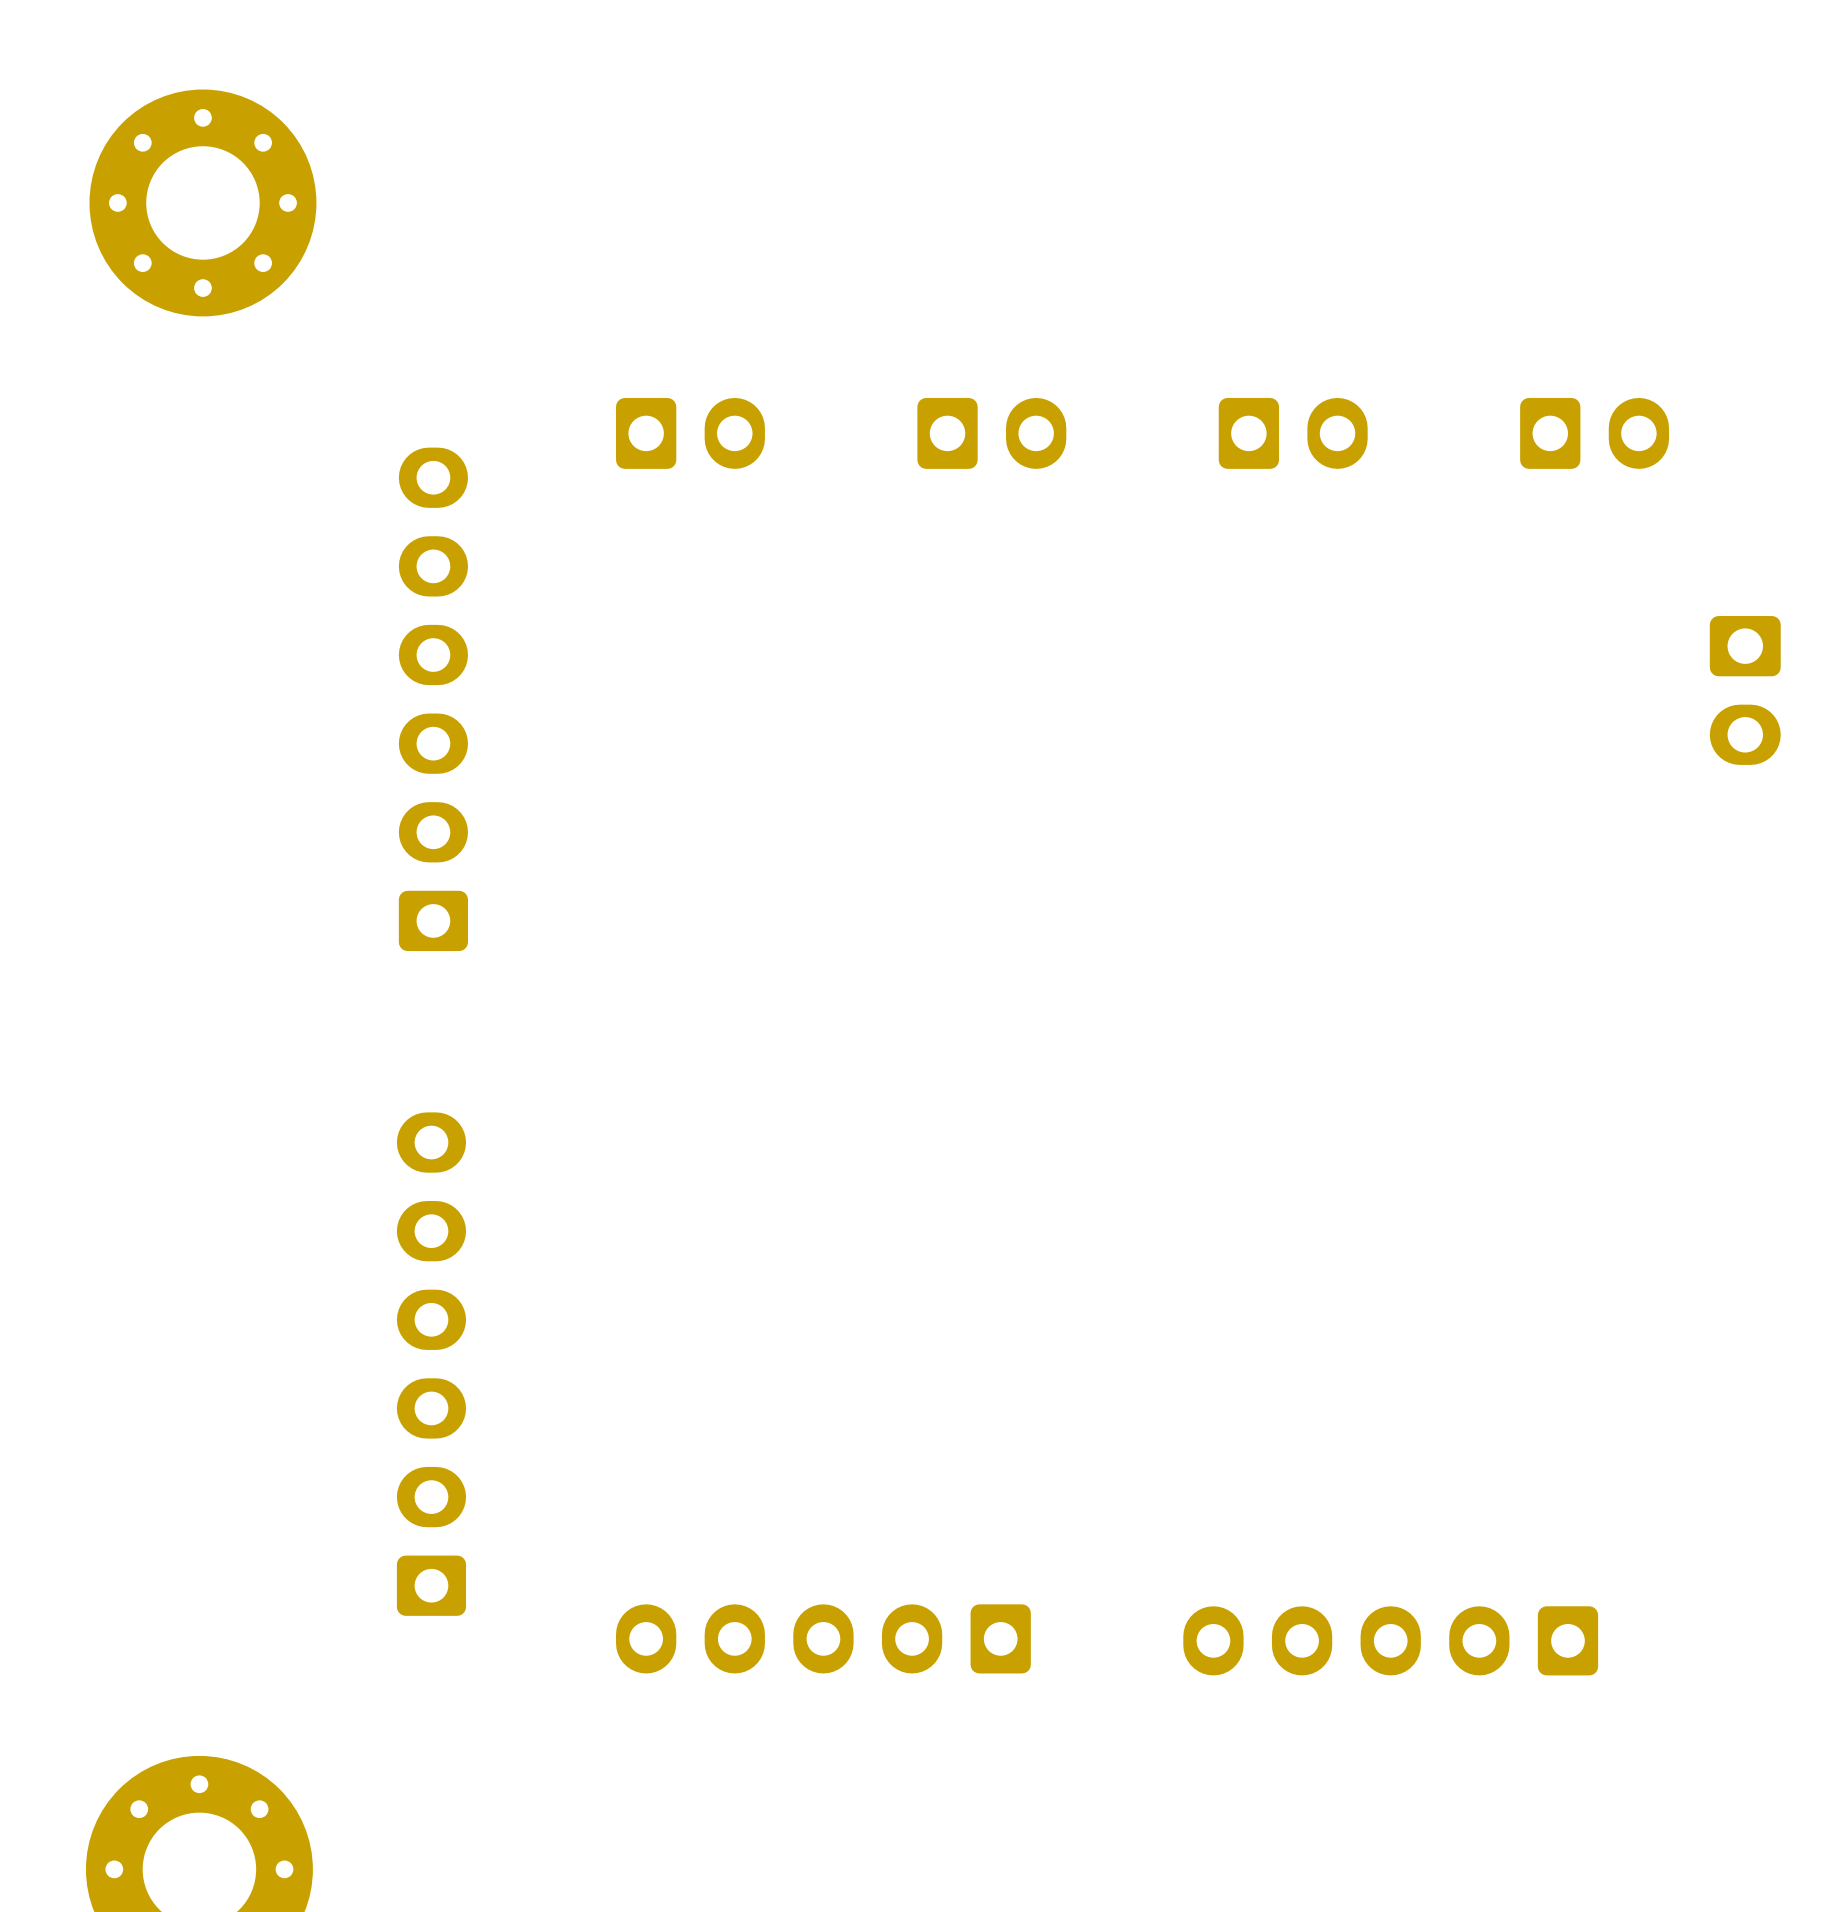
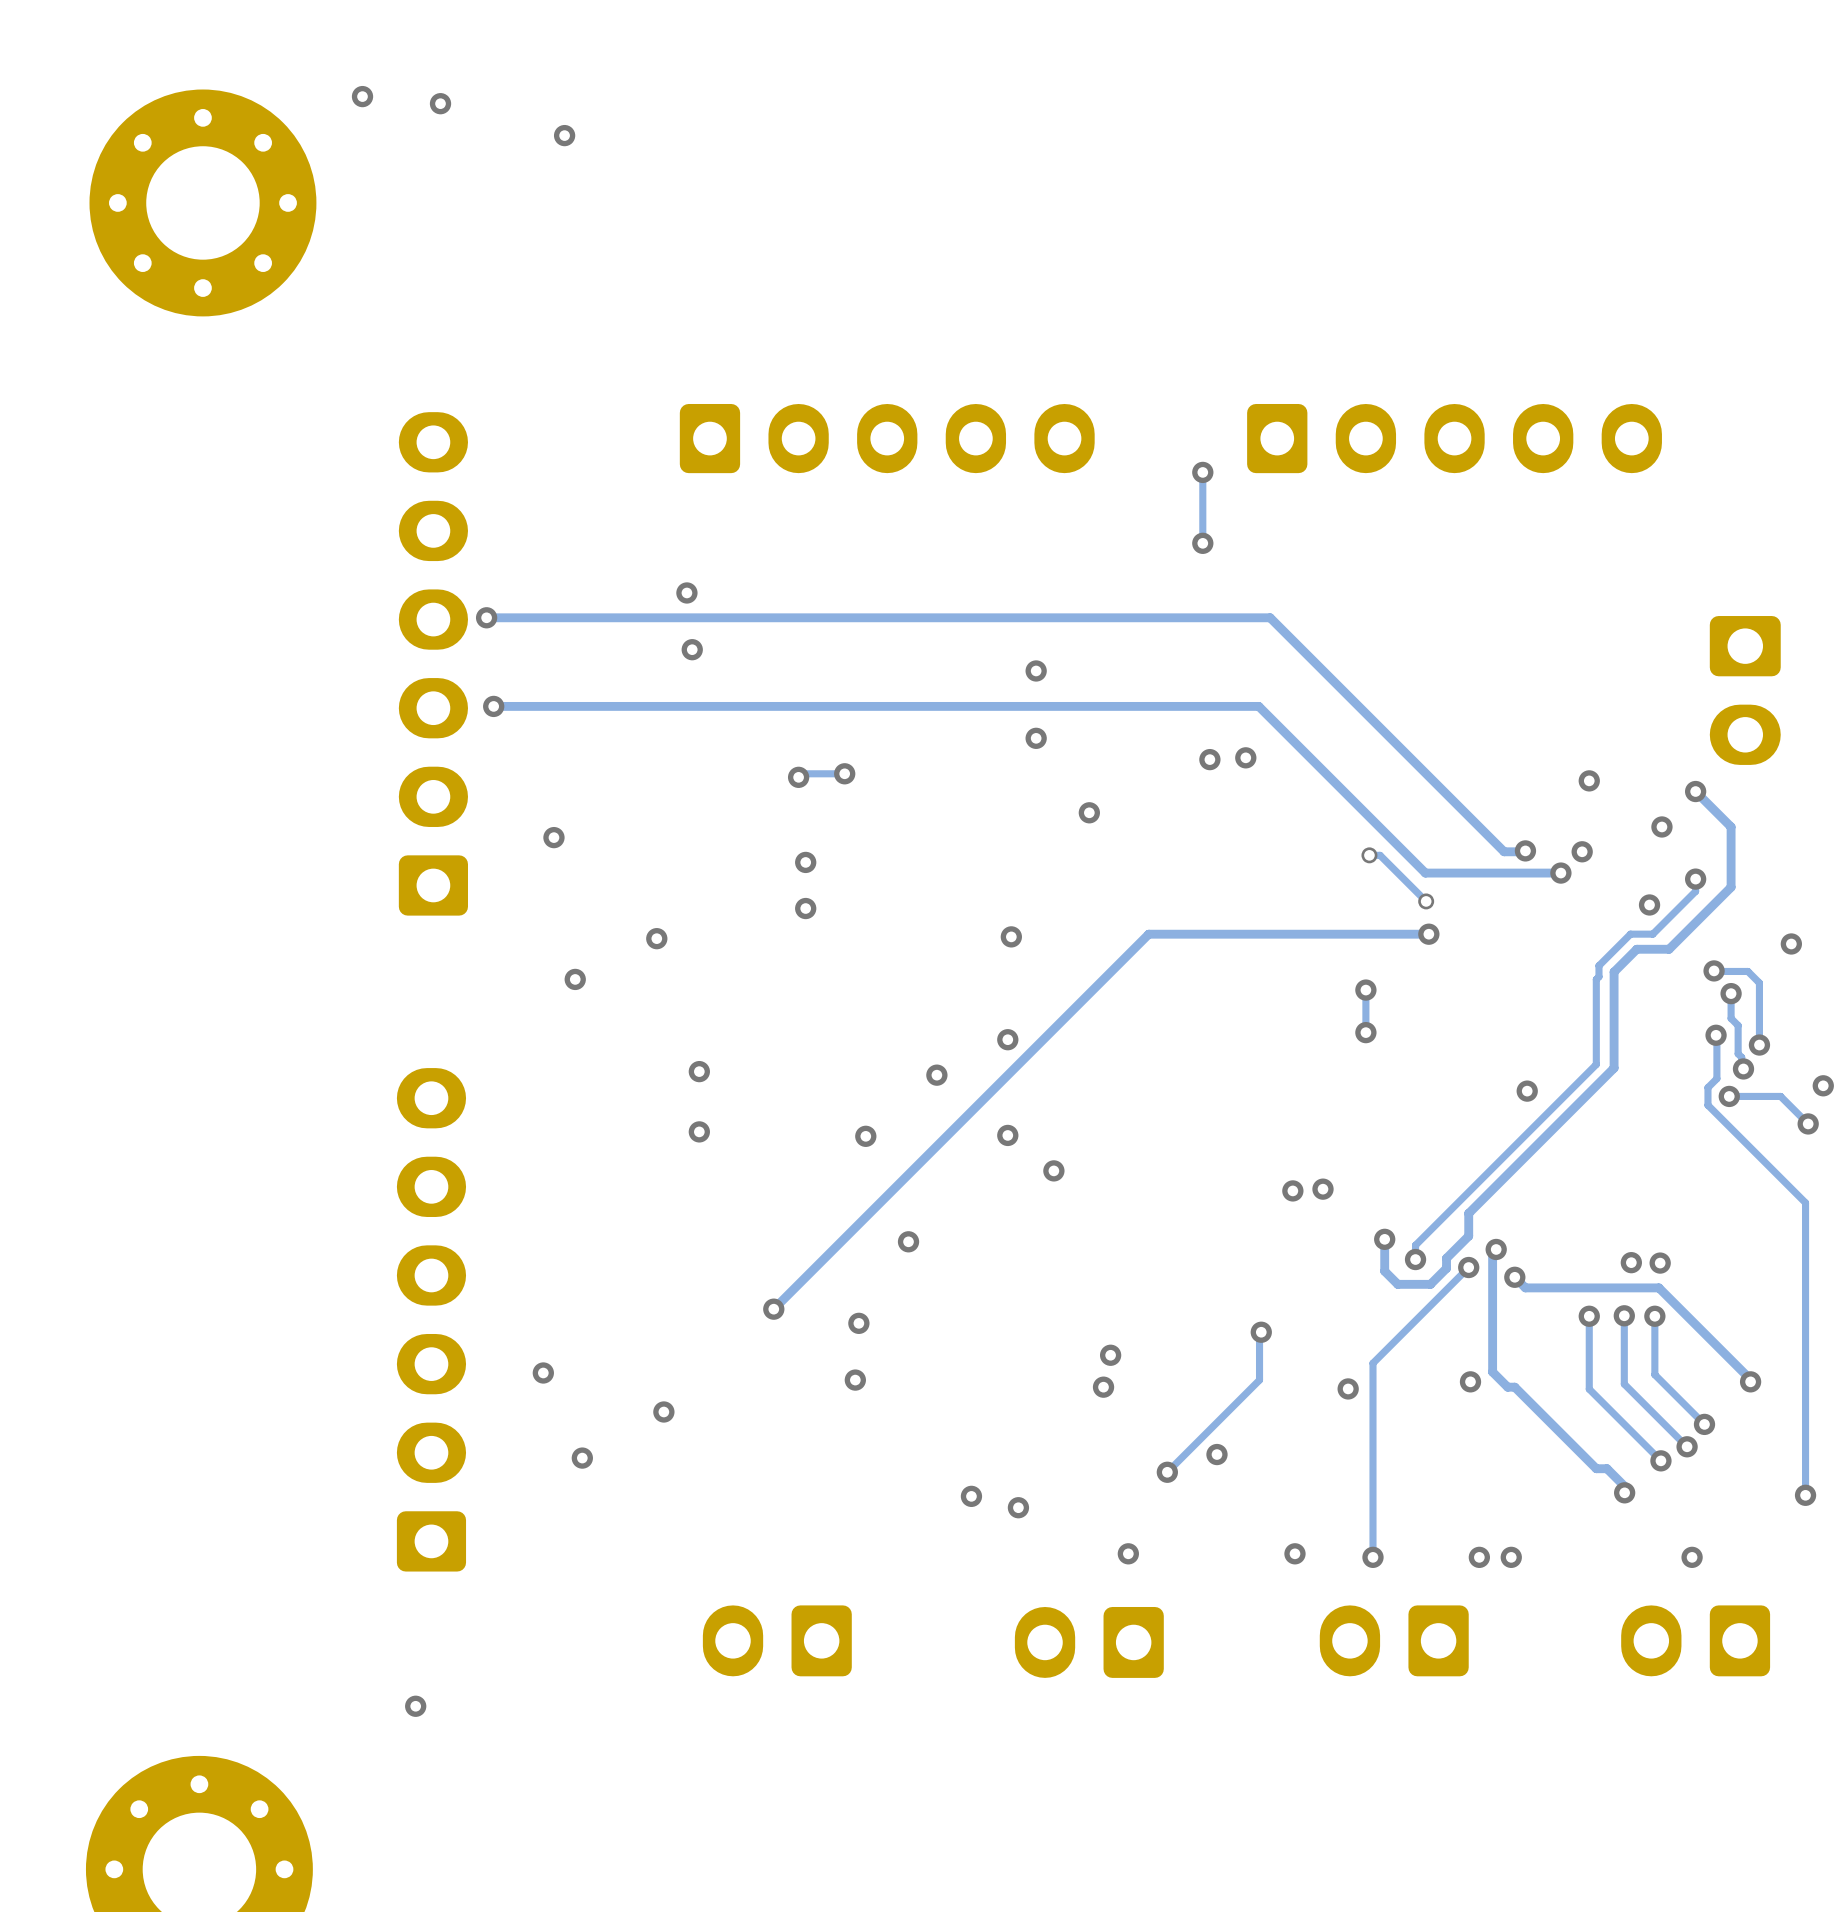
via: none -> (362, 96)
via: none -> (440, 103)
via: none -> (564, 135)
part: (690, 433) -> none
part: (991, 433) -> none
part: (1293, 433) -> none
part: (1594, 433) -> none
part: none -> (887, 438)
part: none -> (1454, 438)
track: none -> (1202, 472) (1202, 543)
via: none -> (1202, 472)
via: none -> (1202, 543)
via: none -> (686, 592)
track: none -> (486, 617) (1270, 617) (1504, 851) (1525, 850)
via: none -> (486, 617)
via: none -> (692, 649)
via: none -> (1036, 670)
part position: (433, 699) -> (433, 663)
track: none -> (493, 706) (1258, 706) (1425, 873) (1560, 873)
via: none -> (493, 706)
via: none -> (1036, 738)
via: none -> (1245, 757)
via: none -> (1209, 759)
track: none -> (844, 773) (802, 773) (798, 777)
via: none -> (844, 773)
via: none -> (798, 777)
via: none -> (1589, 780)
track: none -> (1695, 791) (1731, 826) (1731, 887) (1669, 949) (1636, 949) (1614, 971) (1614, 1068) (1468, 1213) (1468, 1236) (1446, 1258) (1446, 1268) (1430, 1284) (1397, 1284) (1384, 1271) (1384, 1239)
via: none -> (1695, 791)
via: none -> (1089, 812)
via: none -> (1661, 826)
via: none -> (553, 837)
via: none -> (1525, 850)
via: none -> (1582, 851)
track: none -> (1369, 855) (1380, 855) (1426, 901)
via: none -> (1369, 855)
via: none -> (805, 862)
via: none -> (1560, 873)
track: none -> (1695, 879) (1695, 891) (1652, 934) (1630, 934) (1598, 965) (1598, 976) (1596, 979) (1596, 1064) (1415, 1245) (1415, 1259)
via: none -> (1695, 879)
via: none -> (1426, 901)
via: none -> (1649, 904)
via: none -> (805, 908)
track: none -> (1428, 934) (1148, 934) (773, 1309)
via: none -> (1428, 934)
via: none -> (1011, 936)
via: none -> (656, 938)
via: none -> (1791, 943)
track: none -> (1714, 970) (1747, 971) (1759, 982) (1759, 1045)
via: none -> (1714, 970)
via: none -> (575, 979)
track: none -> (1365, 990) (1365, 1032)
via: none -> (1365, 990)
track: none -> (1731, 993) (1731, 1018) (1738, 1025) (1738, 1053) (1741, 1057) (1743, 1068)
via: none -> (1731, 993)
via: none -> (1365, 1032)
track: none -> (1716, 1035) (1716, 1078) (1707, 1087) (1707, 1105) (1805, 1202) (1805, 1495)
via: none -> (1716, 1035)
via: none -> (1007, 1039)
via: none -> (1759, 1045)
via: none -> (1743, 1068)
via: none -> (699, 1071)
via: none -> (936, 1075)
via: none -> (1823, 1085)
via: none -> (1527, 1091)
track: none -> (1729, 1096) (1780, 1096) (1808, 1123)
via: none -> (1729, 1096)
via: none -> (1808, 1123)
via: none -> (699, 1131)
via: none -> (1007, 1135)
via: none -> (865, 1136)
via: none -> (1053, 1170)
via: none -> (1322, 1189)
via: none -> (1292, 1190)
via: none -> (1384, 1239)
via: none -> (908, 1241)
track: none -> (1496, 1249) (1492, 1253) (1492, 1372) (1507, 1387) (1514, 1387) (1596, 1468) (1606, 1468) (1624, 1486) (1624, 1492)
via: none -> (1496, 1249)
via: none -> (1415, 1259)
via: none -> (1631, 1262)
via: none -> (1660, 1263)
track: none -> (1468, 1267) (1372, 1363) (1372, 1557)
via: none -> (1468, 1267)
track: none -> (1514, 1277) (1525, 1287) (1658, 1287) (1750, 1379) (1750, 1381)
via: none -> (1514, 1277)
via: none -> (773, 1309)
track: none -> (1624, 1315) (1624, 1384) (1686, 1446)
via: none -> (1624, 1315)
track: none -> (1589, 1316) (1589, 1389) (1660, 1460)
via: none -> (1589, 1316)
track: none -> (1654, 1316) (1654, 1374) (1704, 1424)
via: none -> (1654, 1316)
via: none -> (858, 1323)
track: none -> (1261, 1332) (1259, 1333) (1259, 1380) (1167, 1472)
via: none -> (1261, 1332)
via: none -> (1110, 1355)
part position: (431, 1364) -> (431, 1319)
via: none -> (543, 1372)
via: none -> (855, 1380)
via: none -> (1470, 1381)
via: none -> (1750, 1381)
via: none -> (1103, 1387)
via: none -> (1348, 1388)
via: none -> (663, 1411)
via: none -> (1704, 1424)
via: none -> (1687, 1446)
via: none -> (1216, 1454)
via: none -> (582, 1458)
via: none -> (1660, 1460)
via: none -> (1167, 1472)
via: none -> (1624, 1492)
via: none -> (1805, 1495)
via: none -> (971, 1496)
via: none -> (1018, 1507)
via: none -> (1128, 1553)
via: none -> (1294, 1553)
via: none -> (1372, 1557)
via: none -> (1479, 1557)
via: none -> (1511, 1557)
via: none -> (1692, 1557)
part footprint: [1183, 1606, 1599, 1676] -> [1319, 1605, 1469, 1677]
part: (823, 1638) -> none
part: none -> (777, 1640)
part: none -> (1695, 1640)
part: none -> (1089, 1642)
via: none -> (415, 1706)

